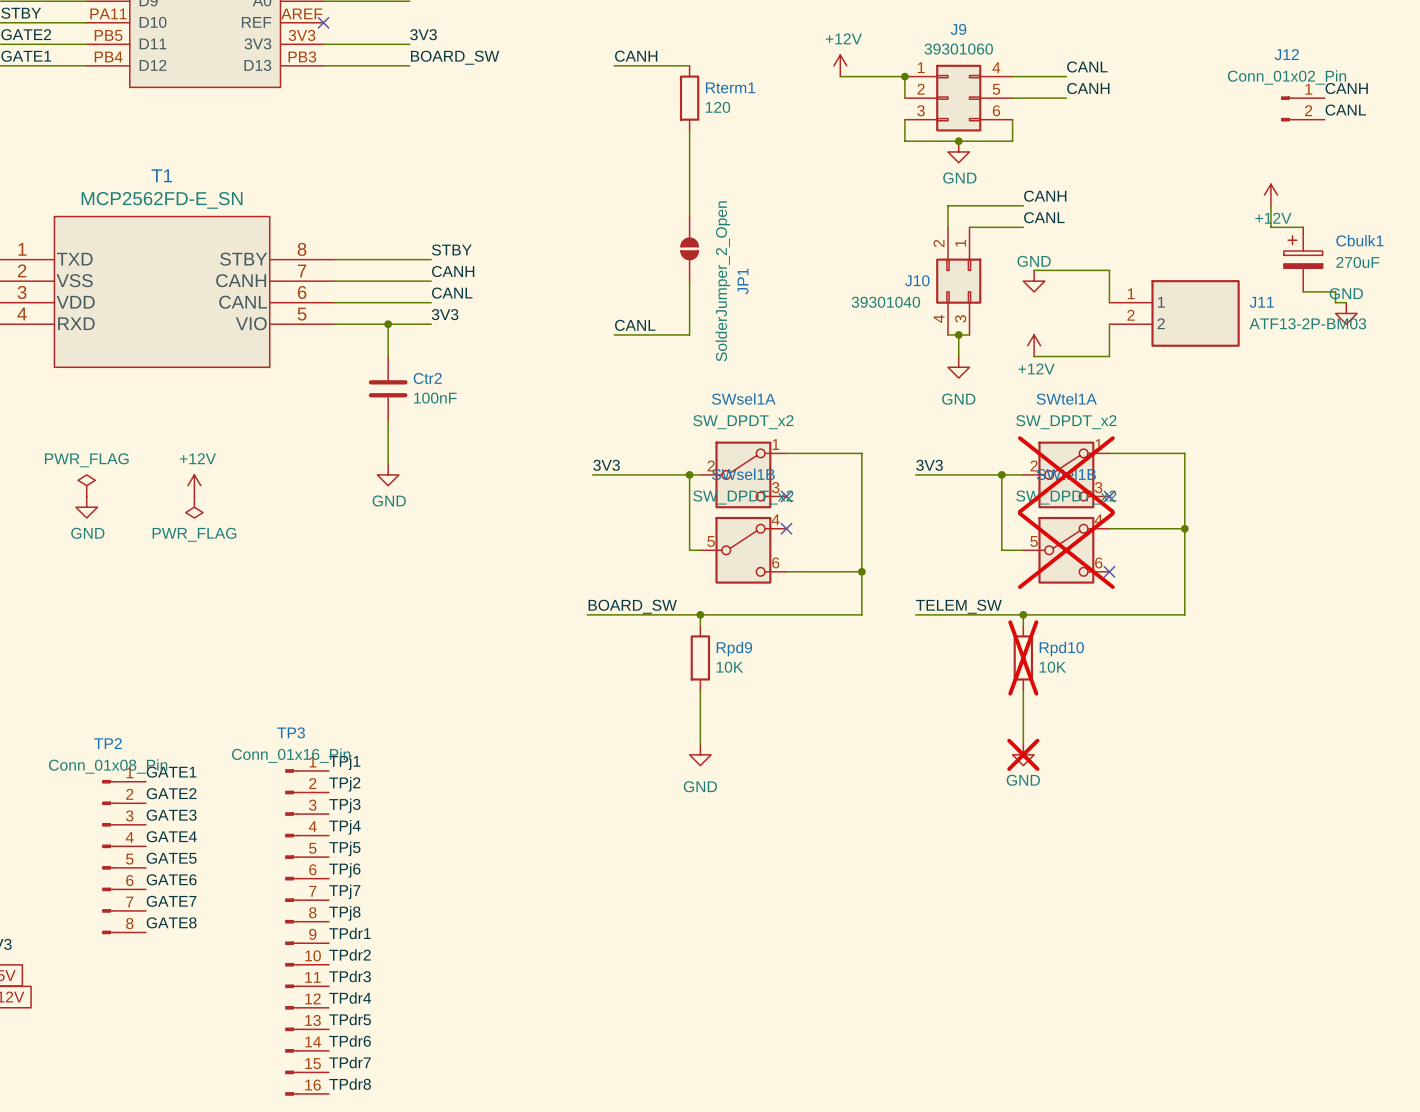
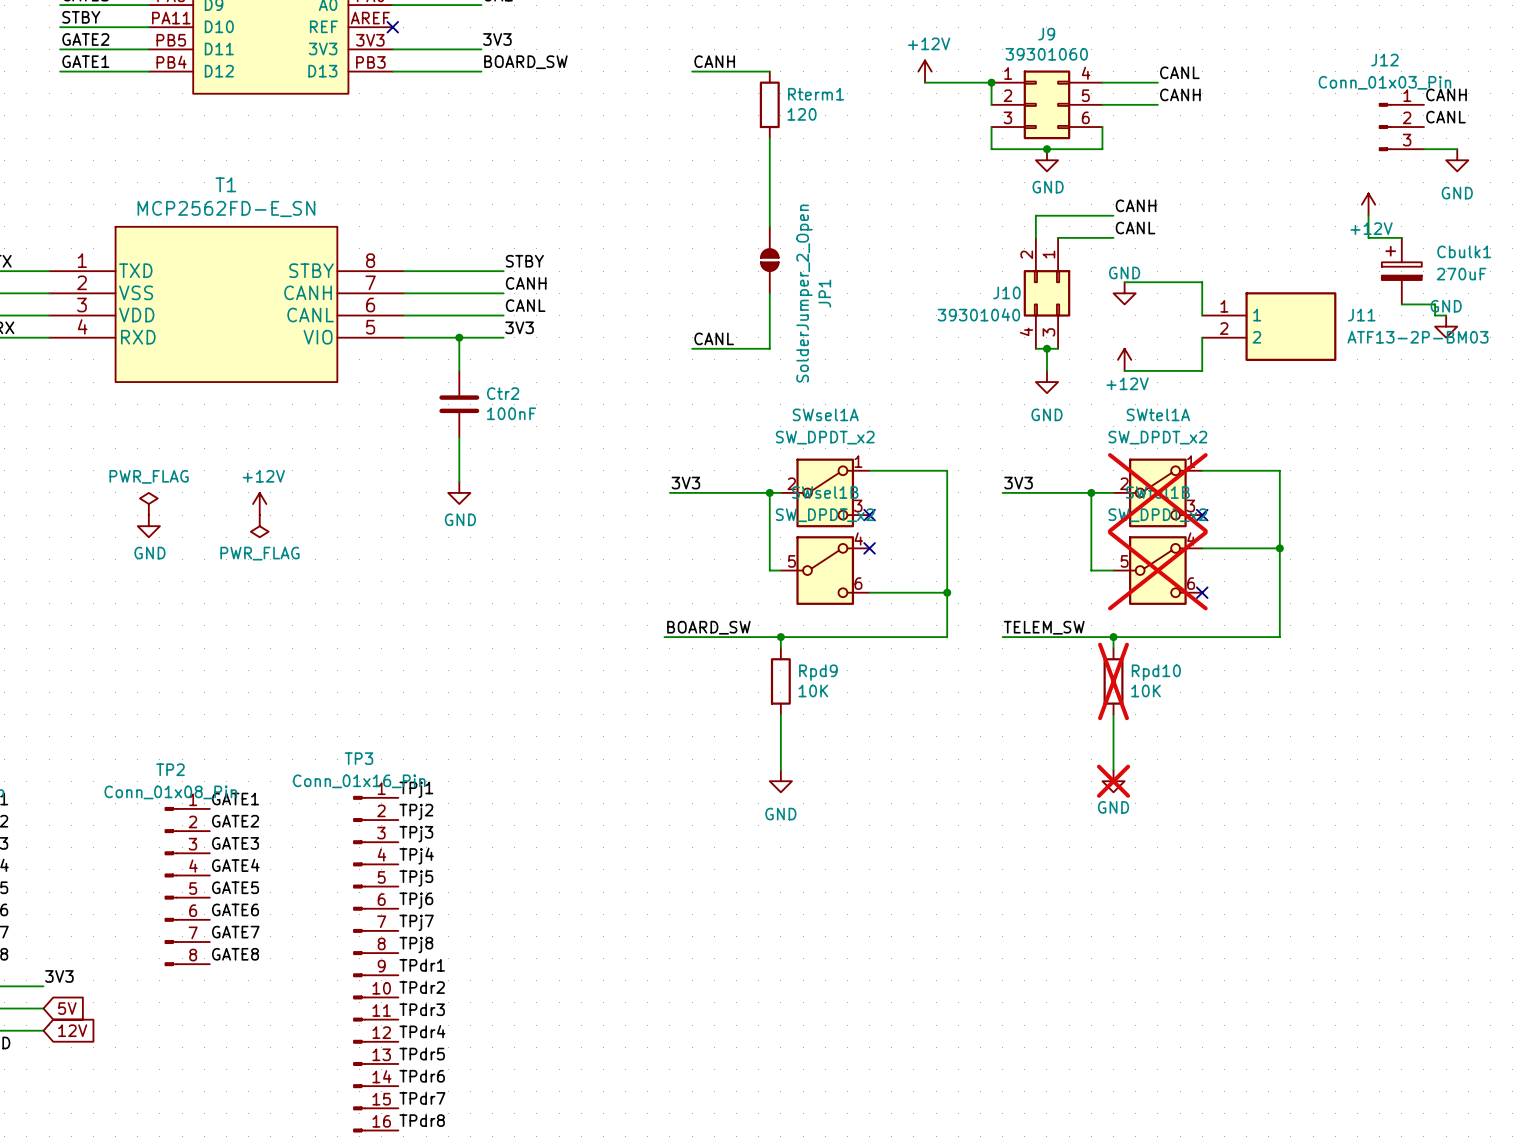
J12 value: Conn_01x02_Pin (1286, 77) -> Conn_01x03_Pin (1384, 82)
J12 symbol: [1281, 96, 1325, 122] -> [1378, 103, 1424, 151]
wire: none -> (1423, 149) (1457, 149)
power symbol: none -> GND (1457, 160)

